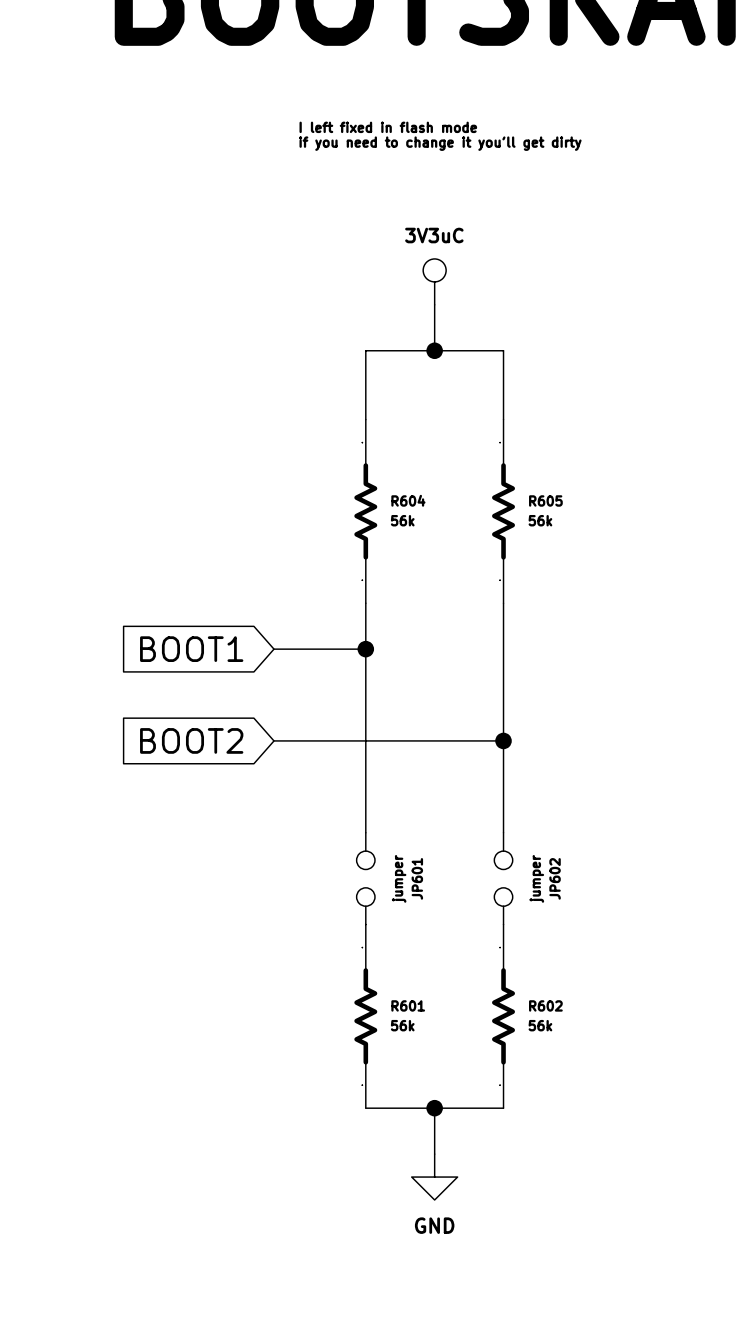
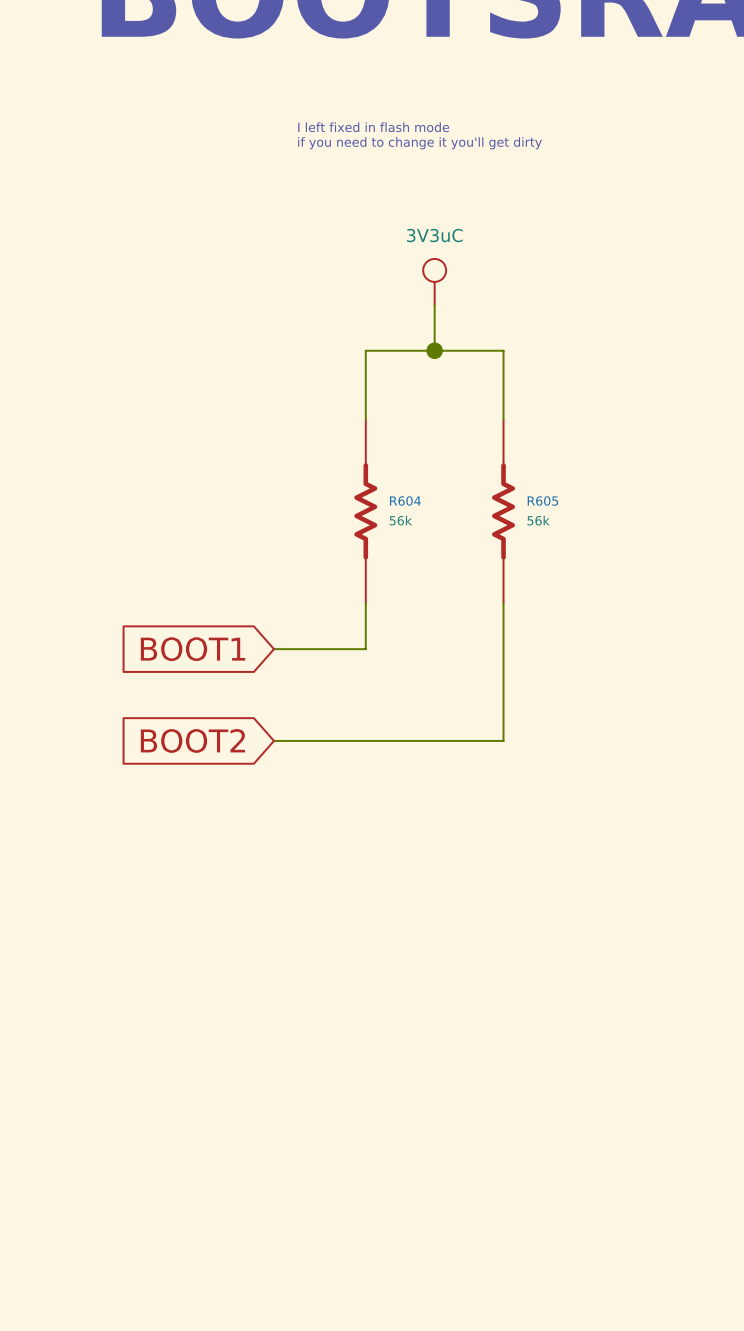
wire: (365, 649) (365, 832) -> none
junction: (365, 649) -> none
wire: (503, 740) (503, 832) -> none
junction: (503, 740) -> none
JP601: jumper (365, 878) -> none
JP602: jumper (503, 878) -> none
R601: 56k (365, 1016) -> none
R602: 56k (503, 1016) -> none
wire: (365, 1108) (503, 1108) -> none
wire: (434, 1108) (434, 1154) -> none
junction: (434, 1108) -> none
power symbol: GND (434, 1177) -> none

